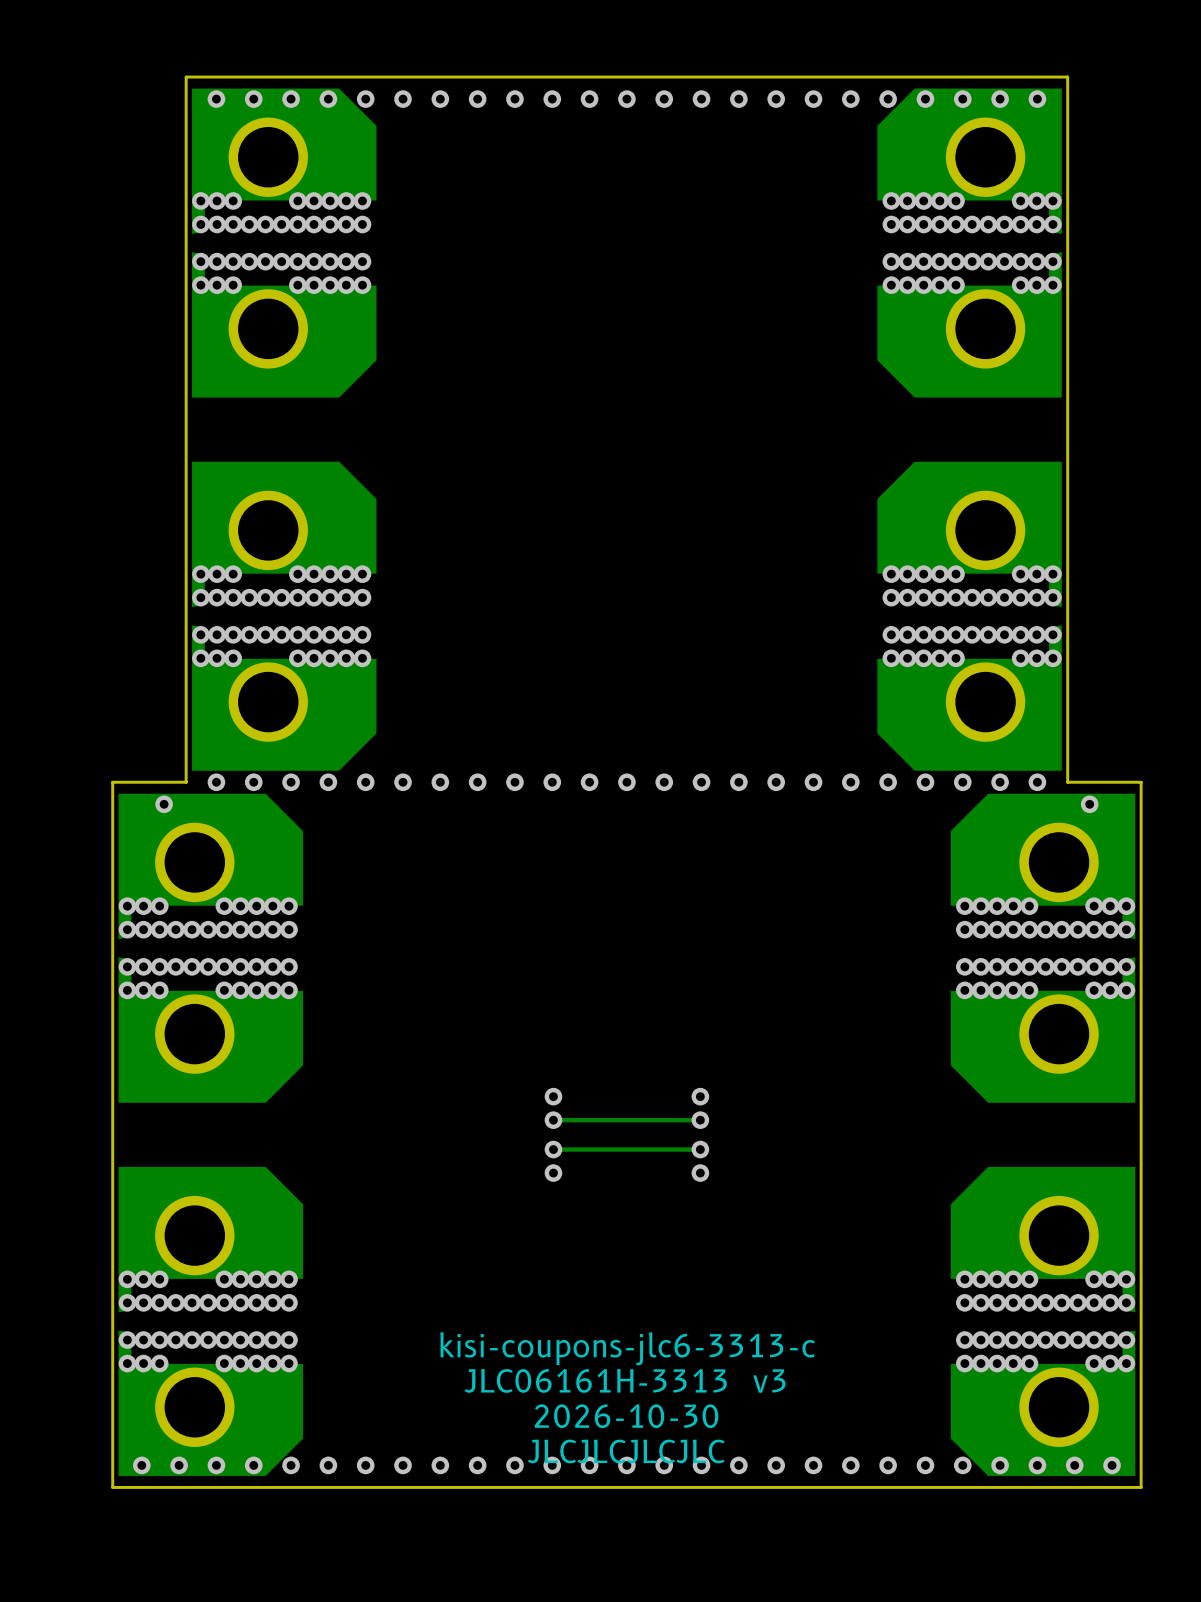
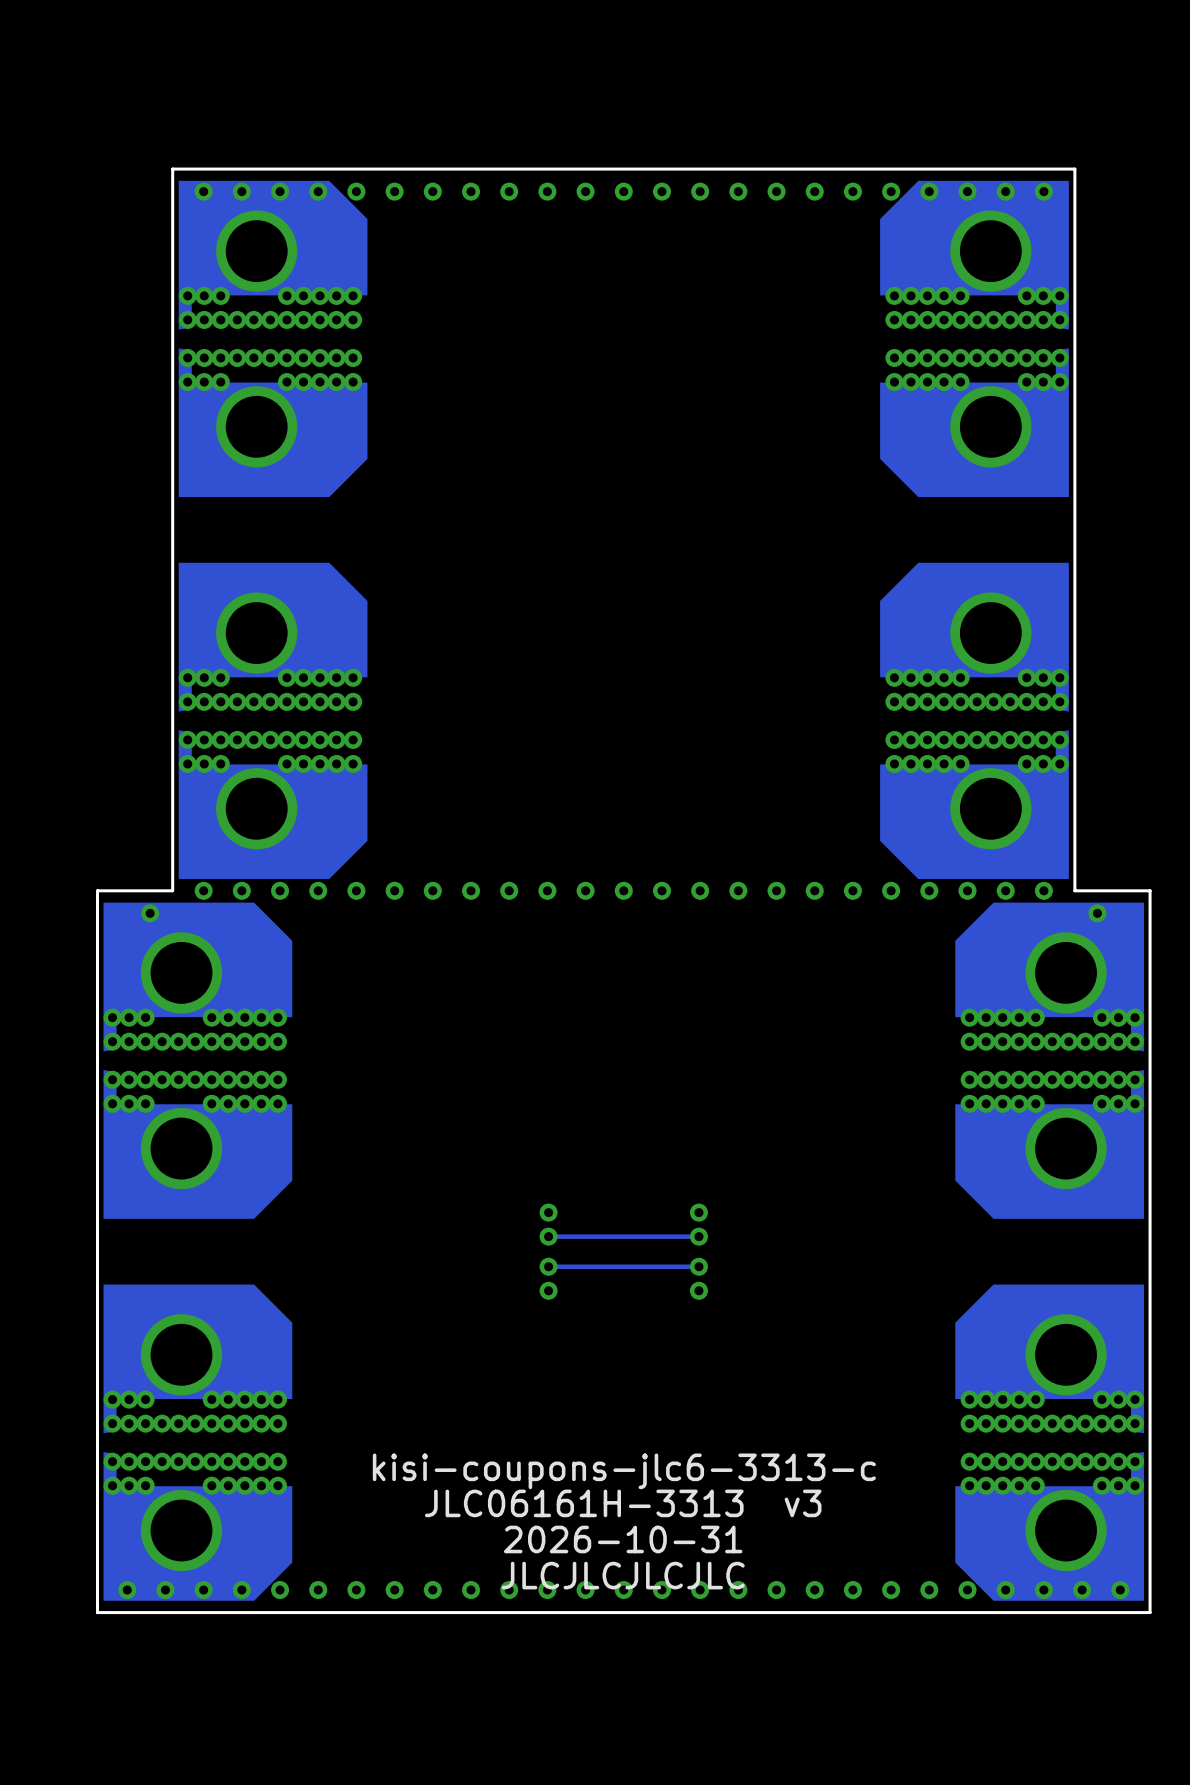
text: 2026-10-30 (626, 1416) -> 2026-10-31 (623, 1539)

